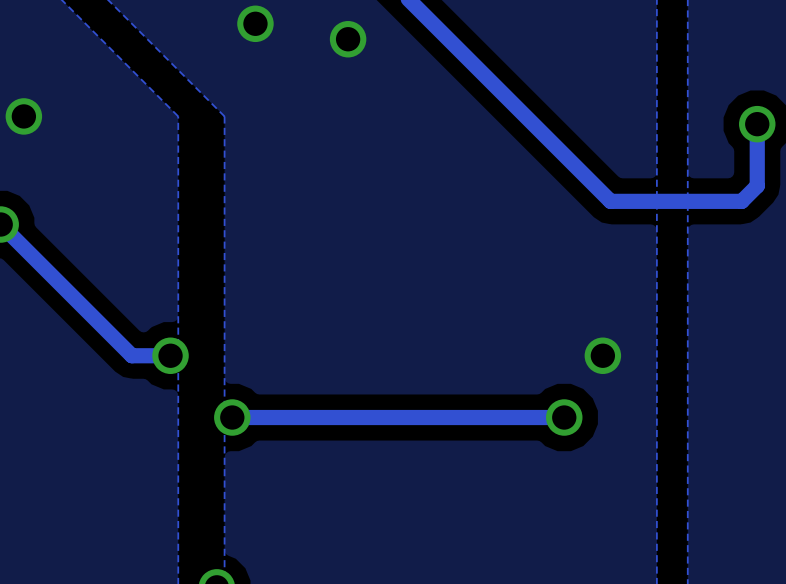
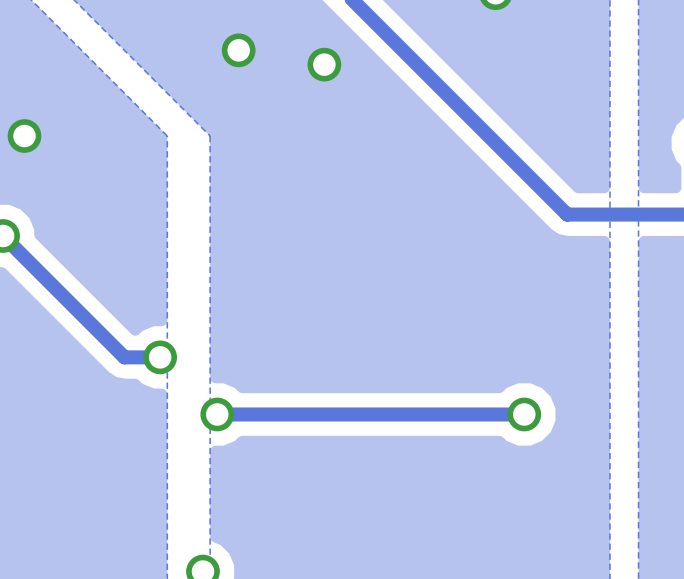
via: (602, 355) -> none

